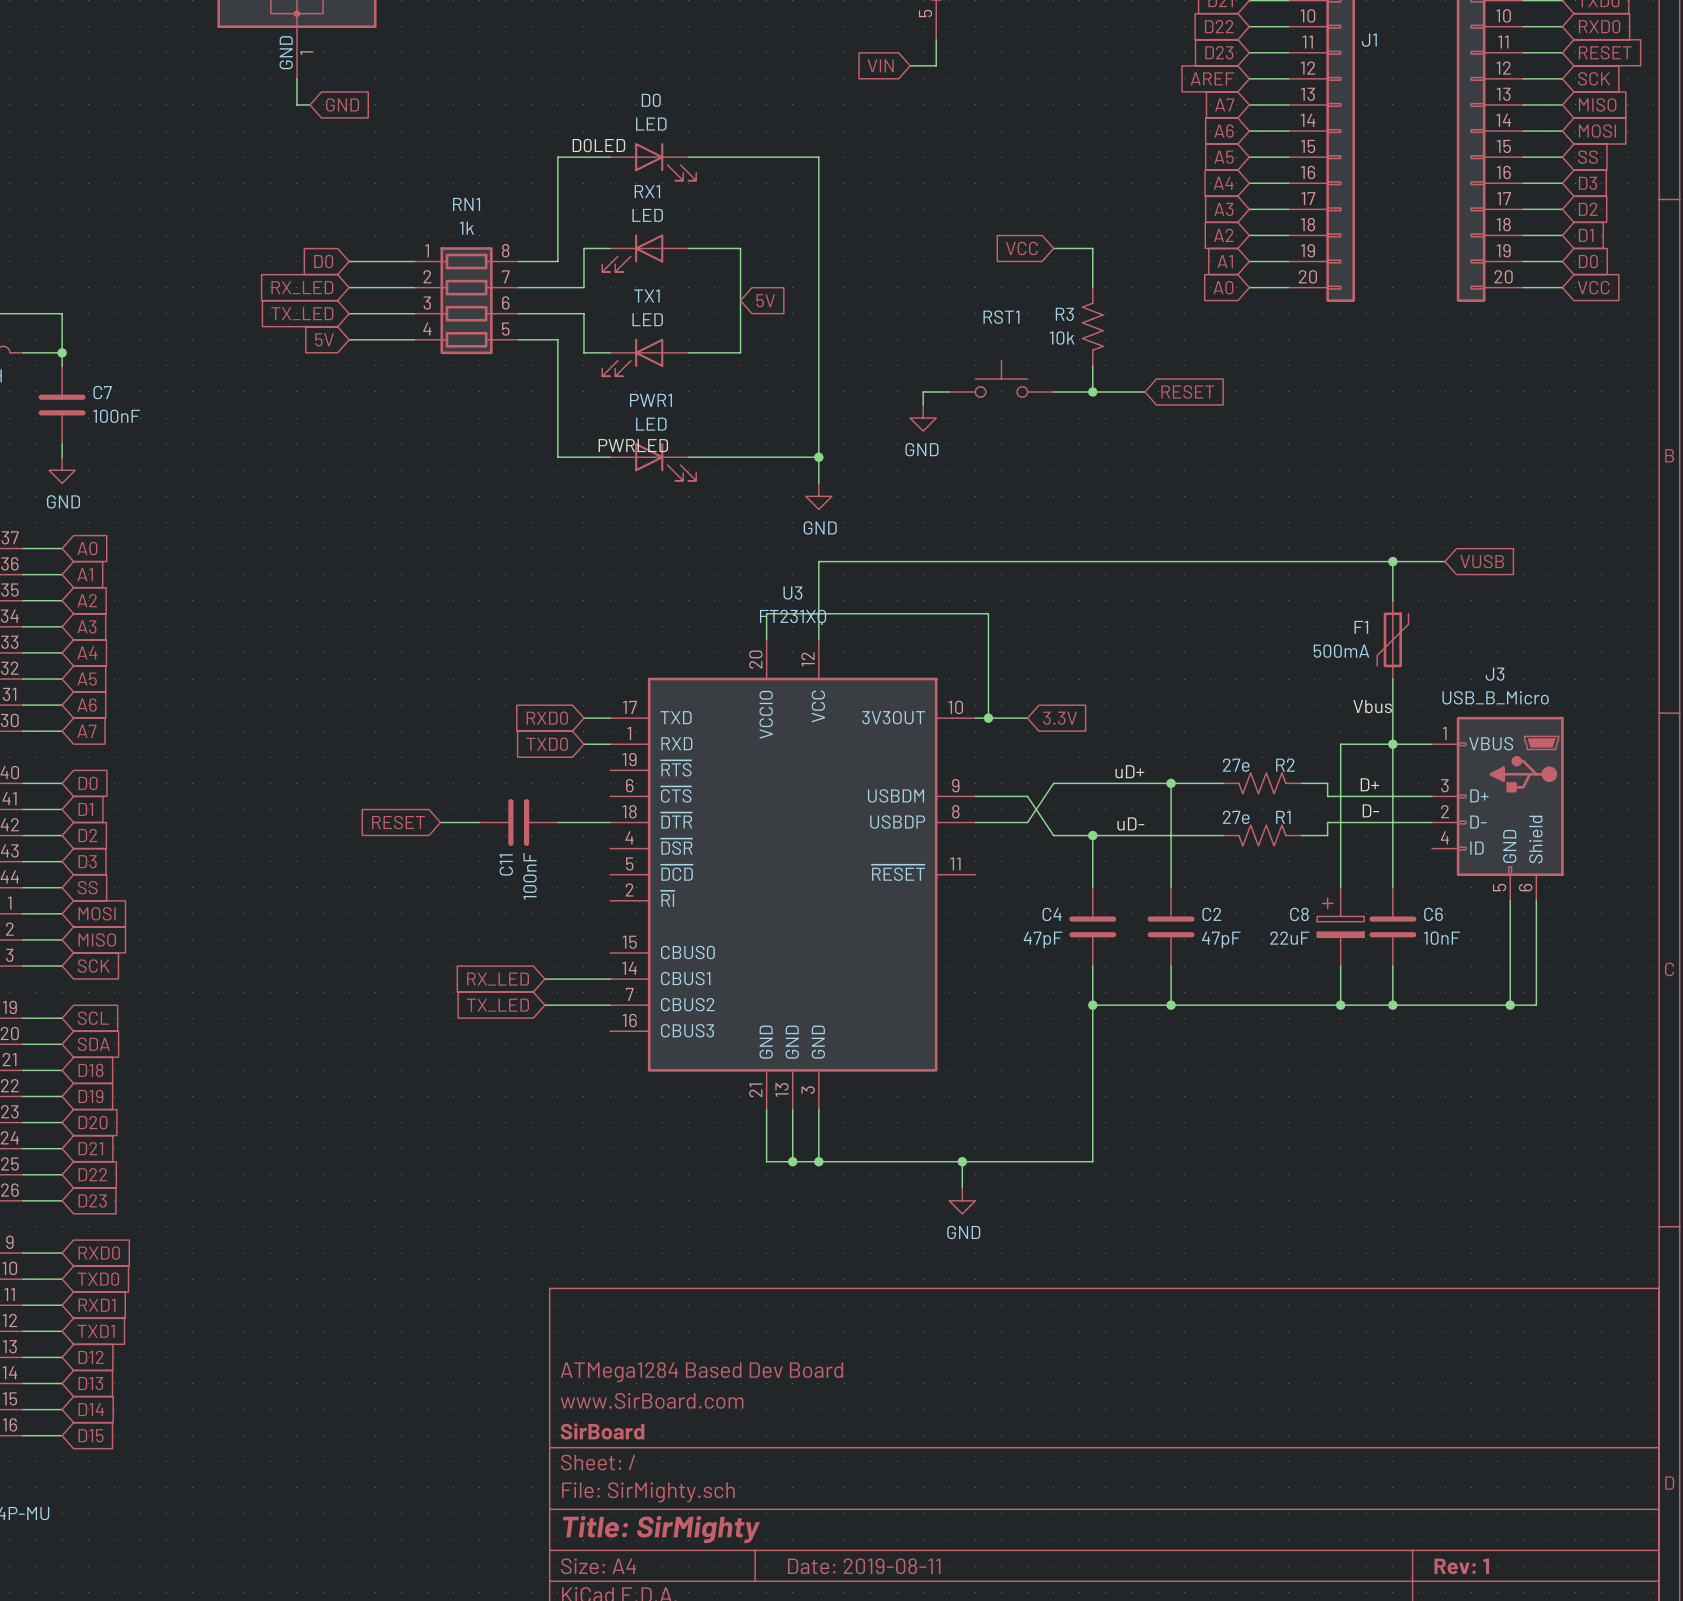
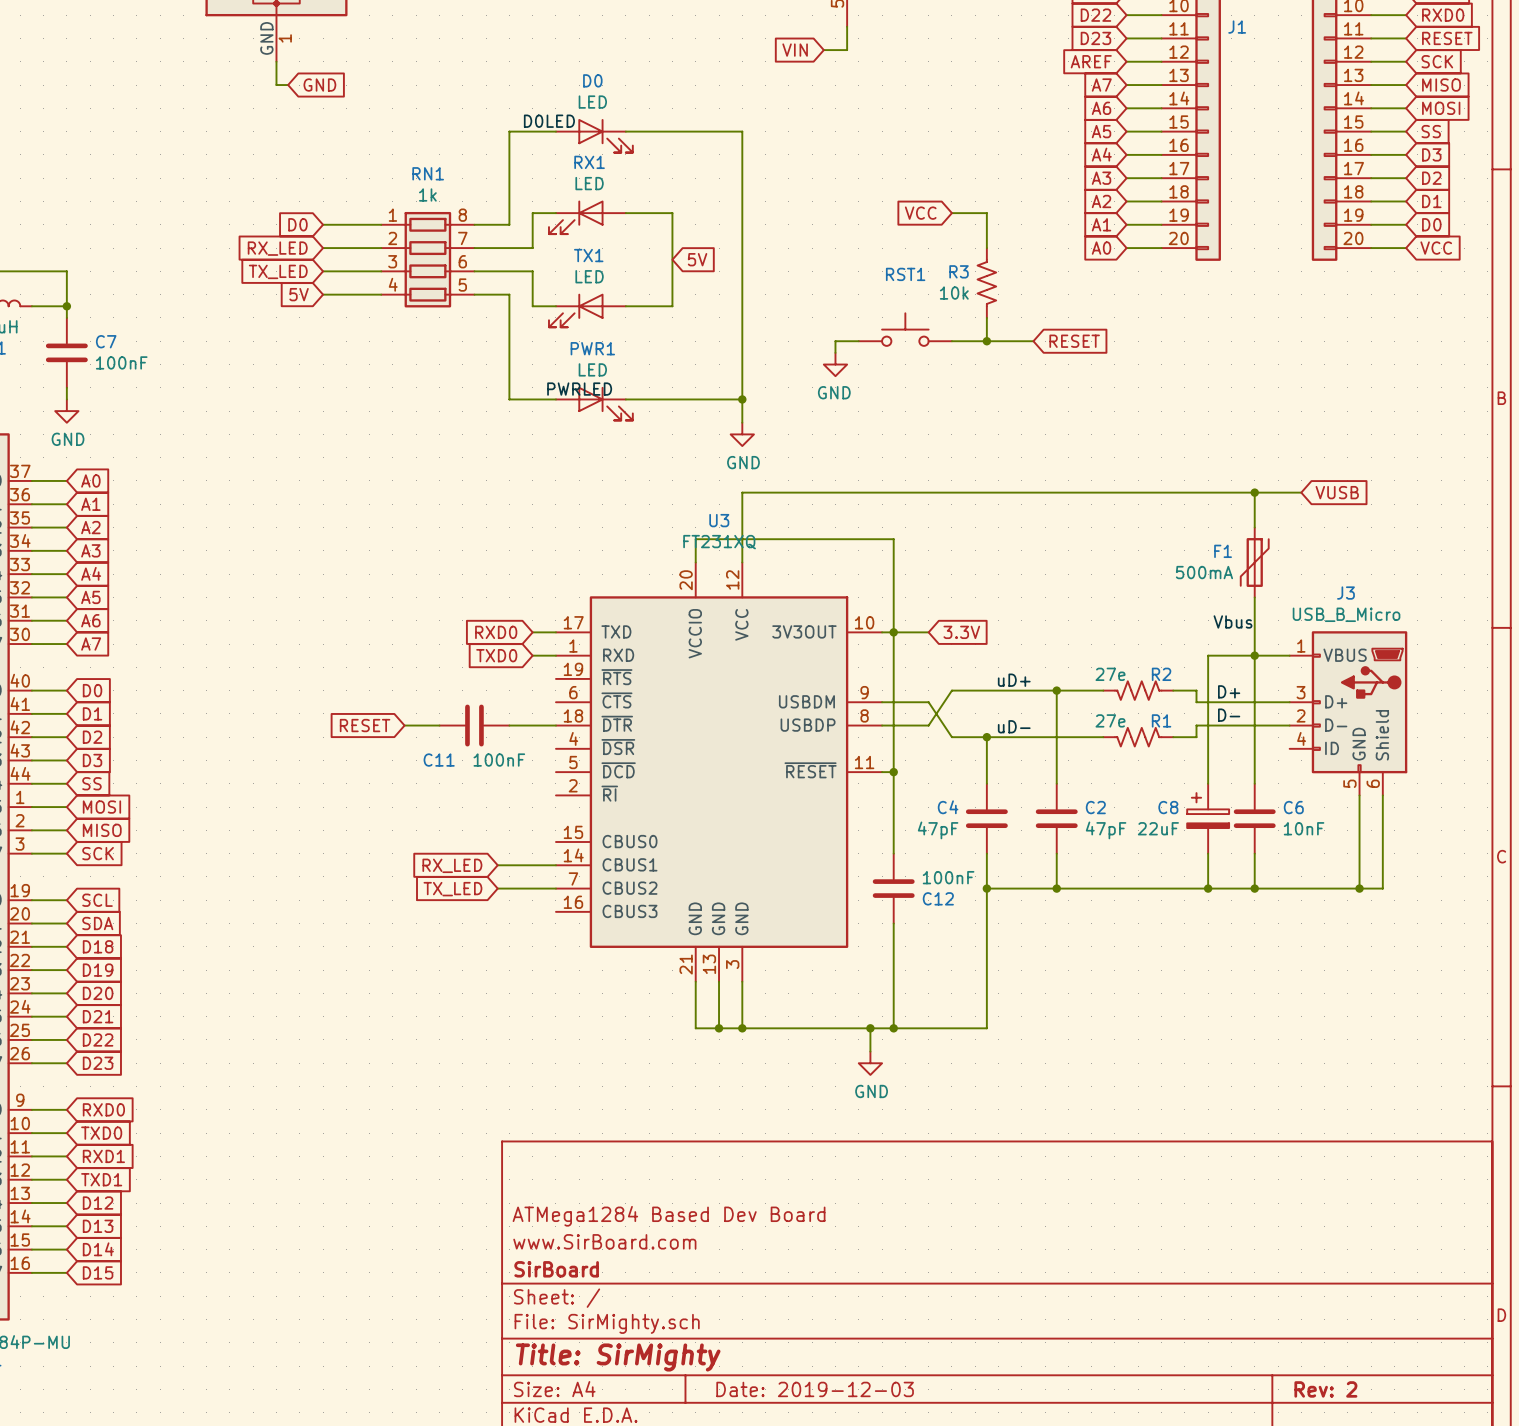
wire: none -> (893, 632) (893, 853)
C11 name rotation: 0° (506, 864) -> 90° clockwise (439, 760)
wire: none -> (882, 772) (893, 772)
junction: none -> (893, 772)
C11 value rotation: 0° (530, 876) -> 90° clockwise (499, 760)
C12: none -> 100nF (893, 888)
wire: none -> (893, 923) (893, 1028)
junction: none -> (893, 1028)
title block: Date: 2019-08-11 (864, 1566) -> Date: 2019-12-03 (815, 1389)
title block: Rev: 1 (1461, 1566) -> Rev: 2 (1325, 1389)

